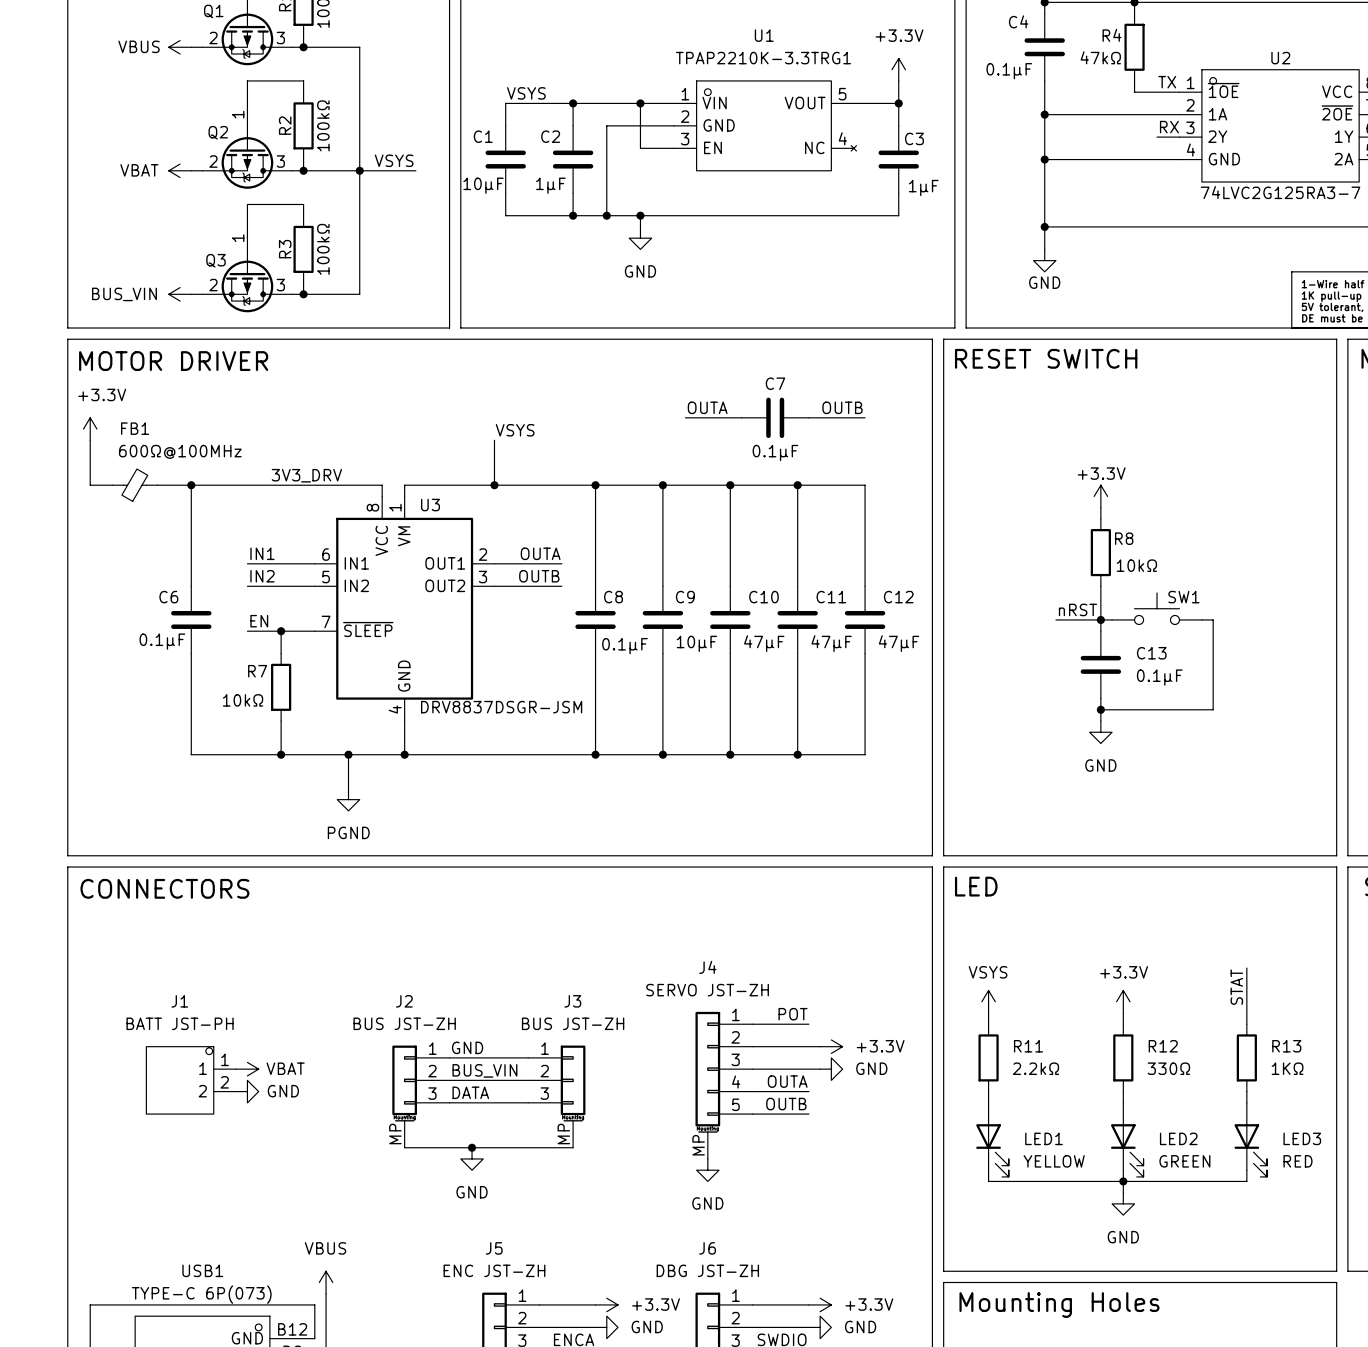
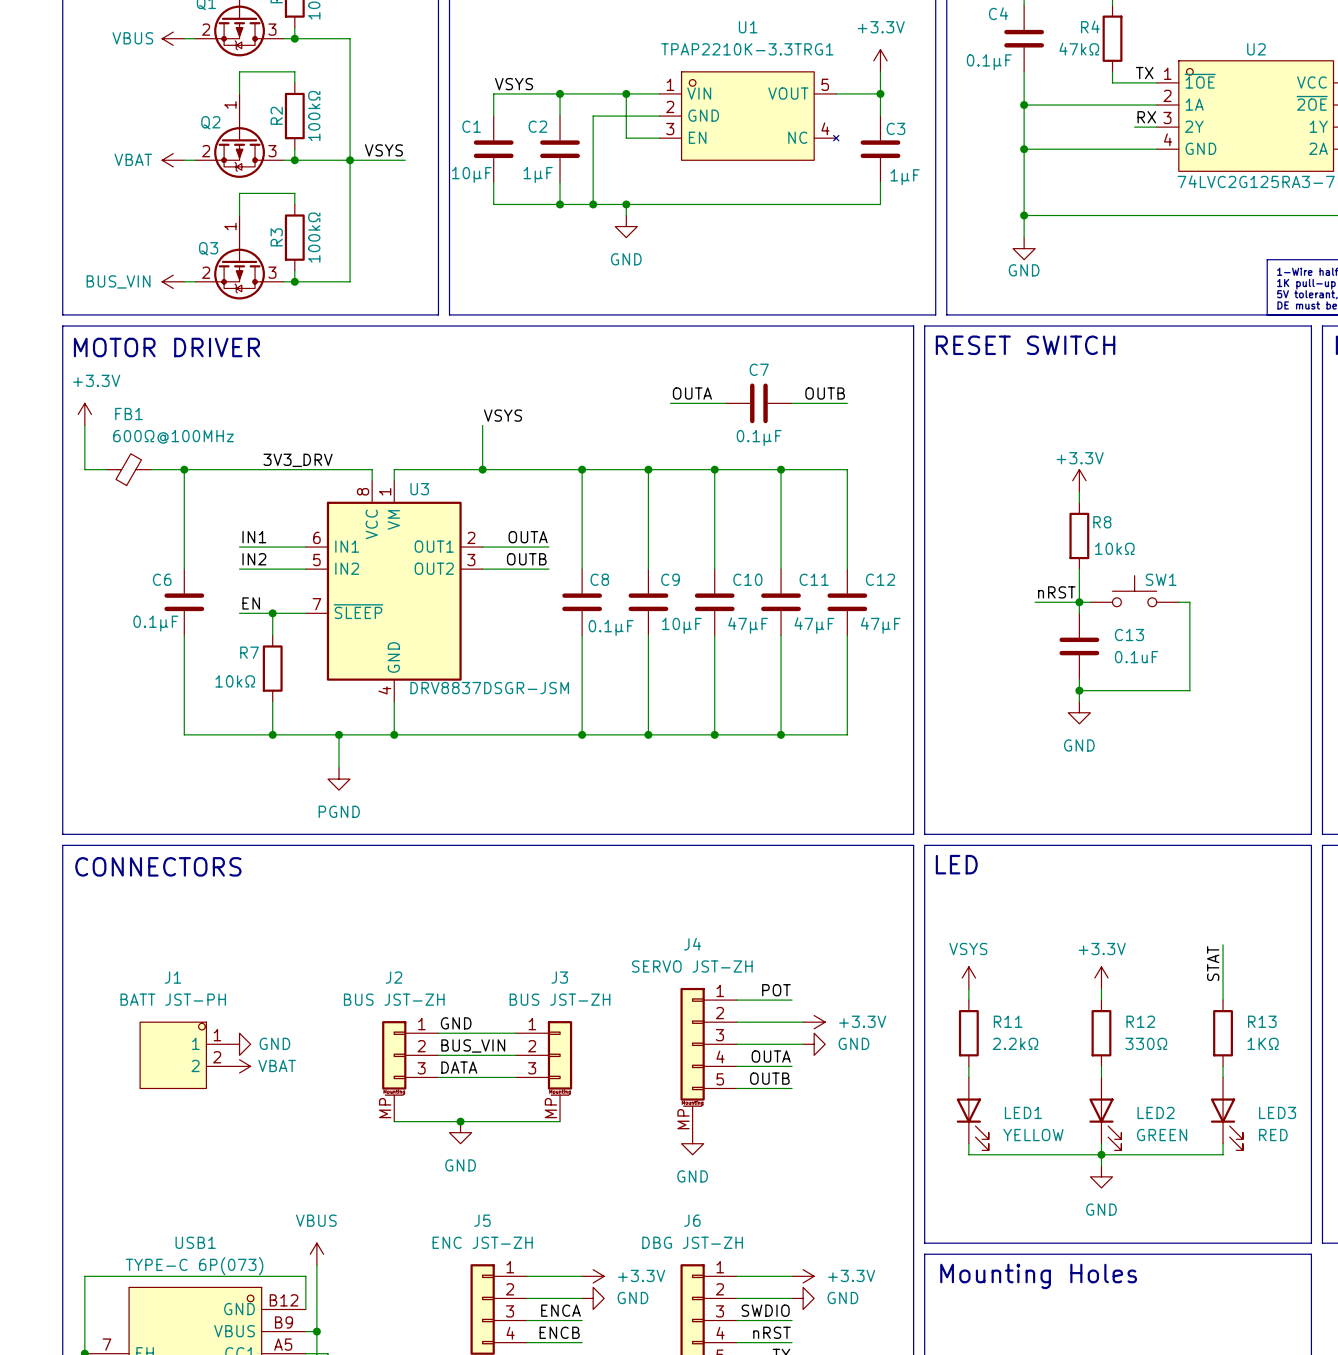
C13 value: 0.1µF (1159, 677) -> 0.1uF (1136, 657)
power symbol: VBAT (247, 1069) -> GND (239, 1044)
power symbol: GND (247, 1091) -> VBAT (239, 1066)

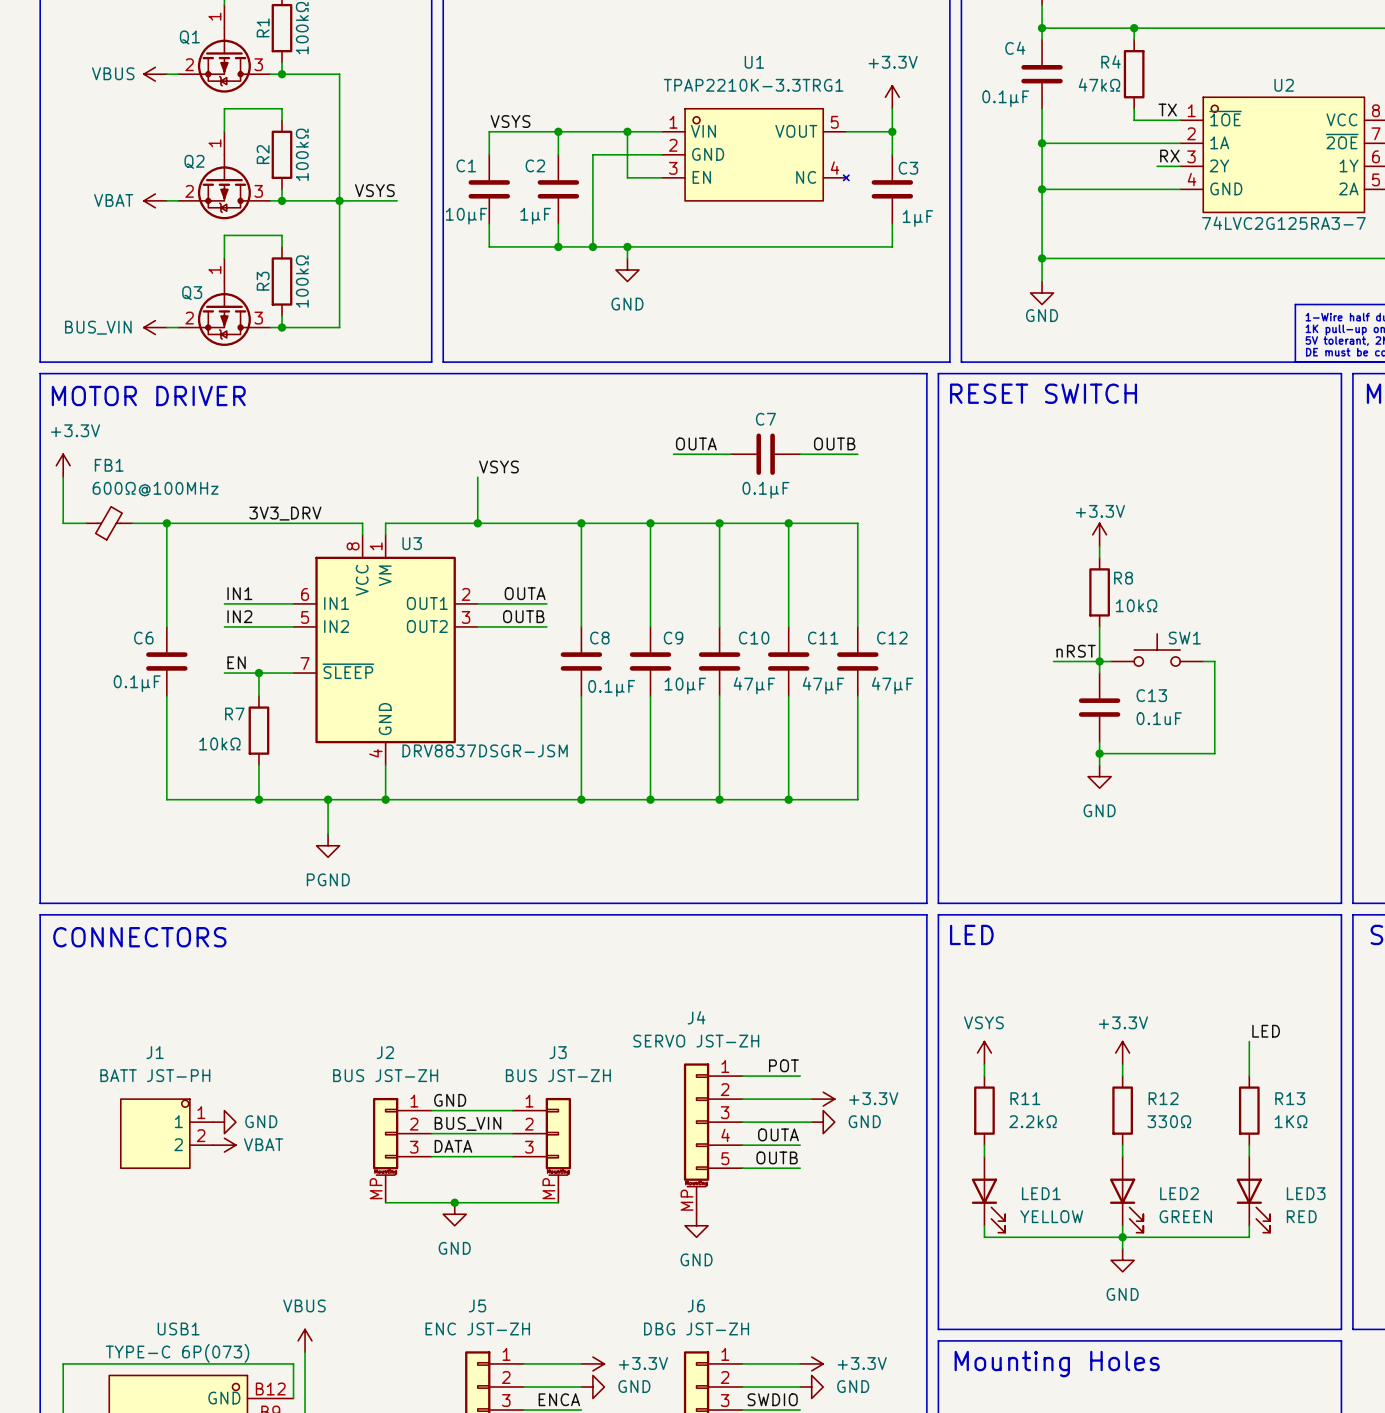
wire: (1223, 944) (1223, 966) -> none
label: none -> LED (1266, 1031)
label: STAT (1213, 963) -> none

